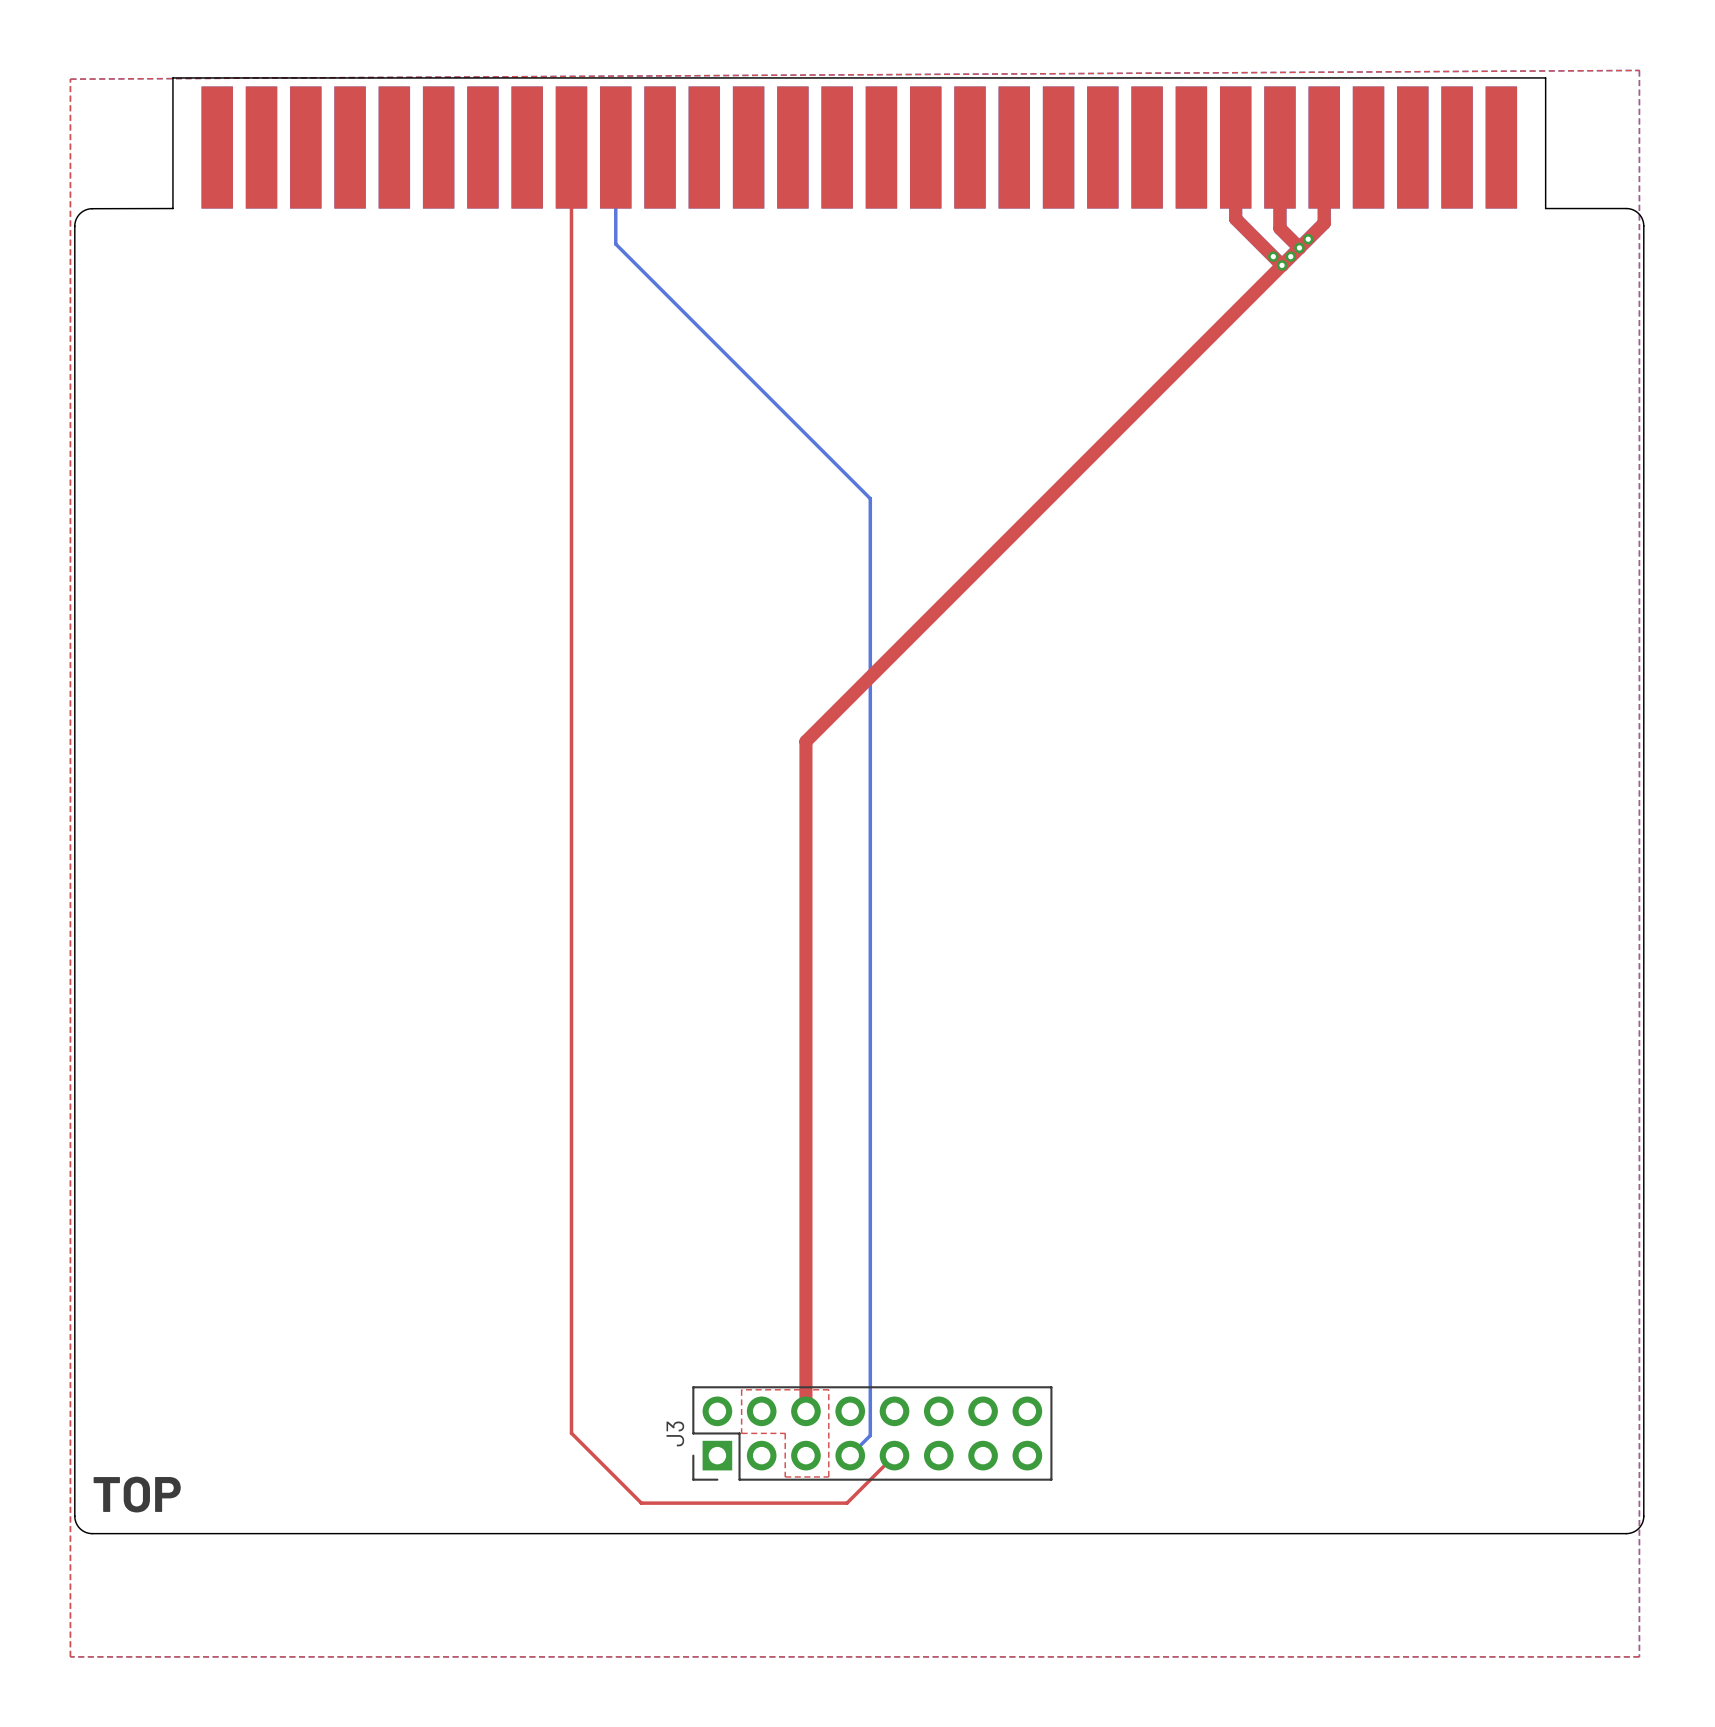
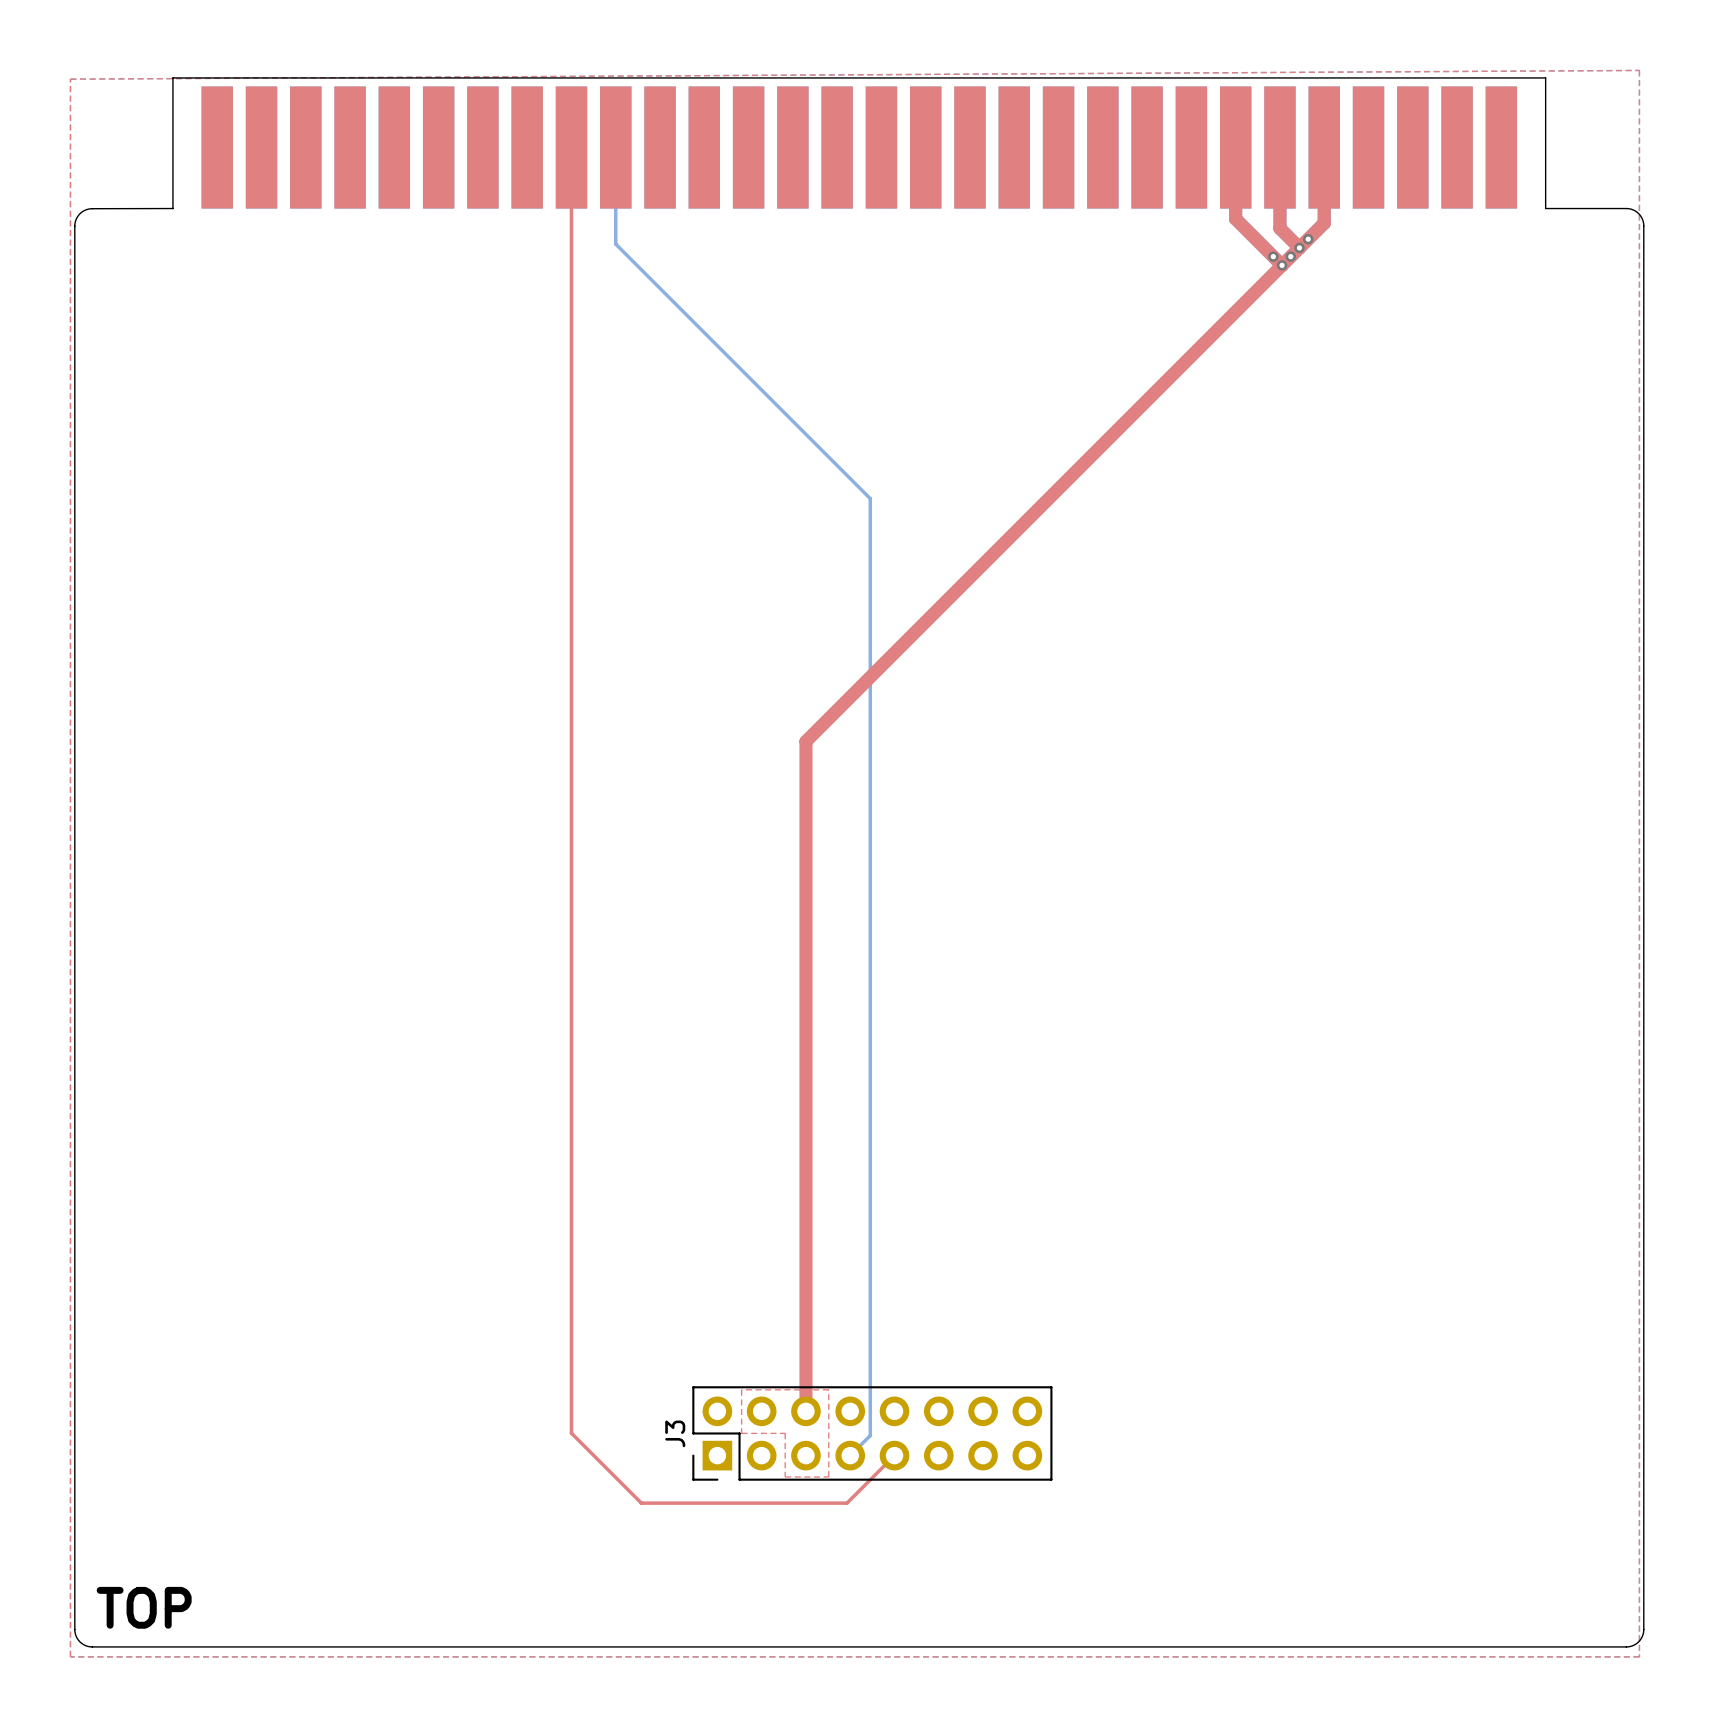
part: (859, 805) -> none
part: none -> (859, 862)

